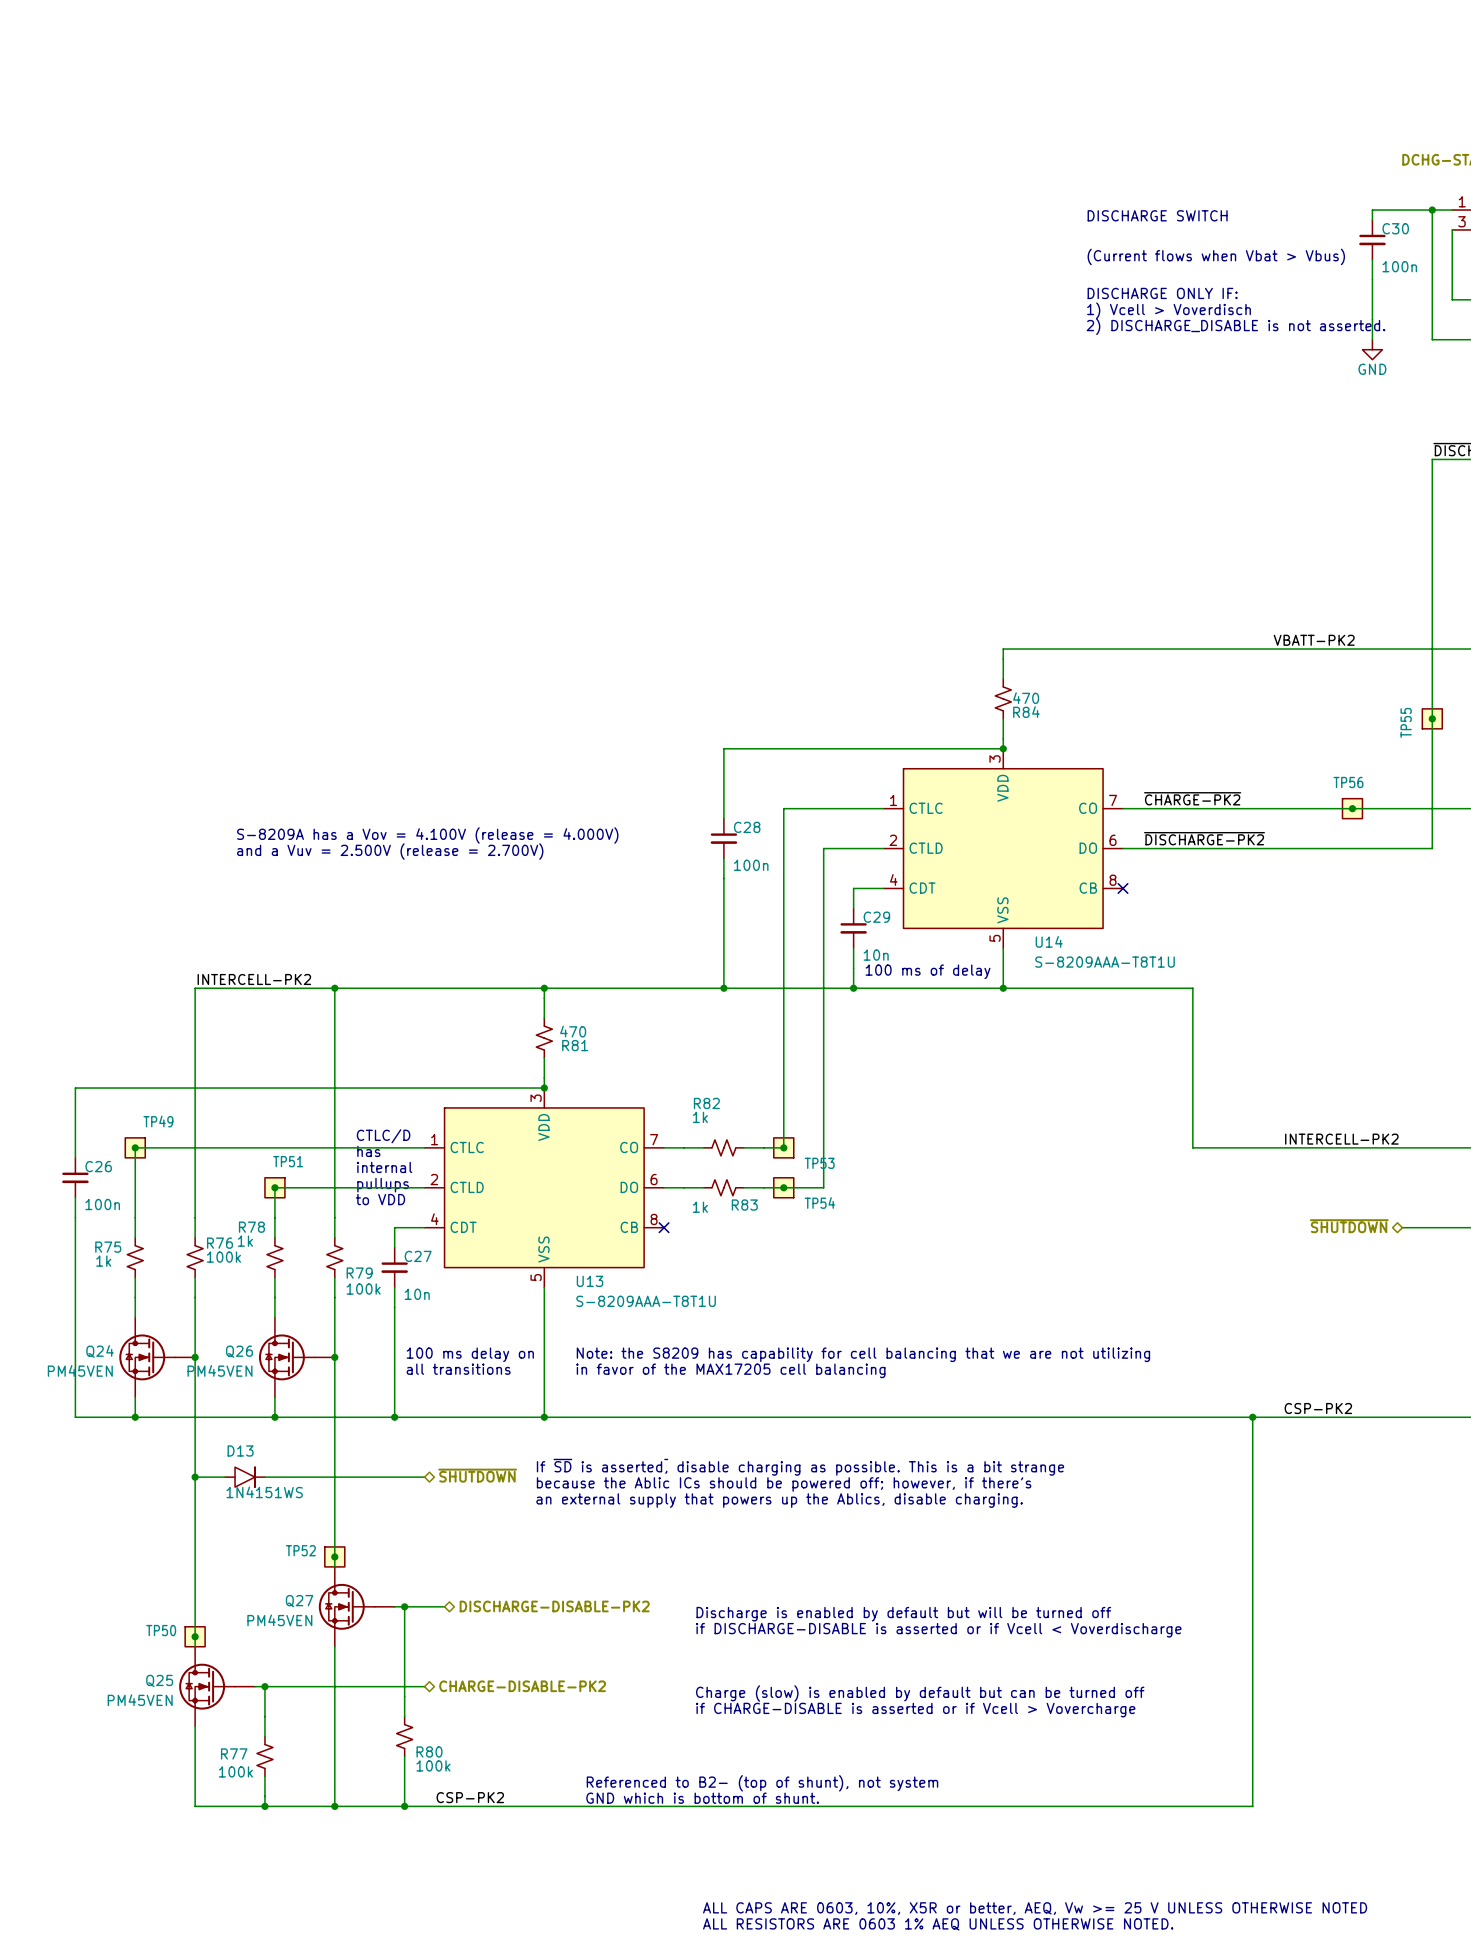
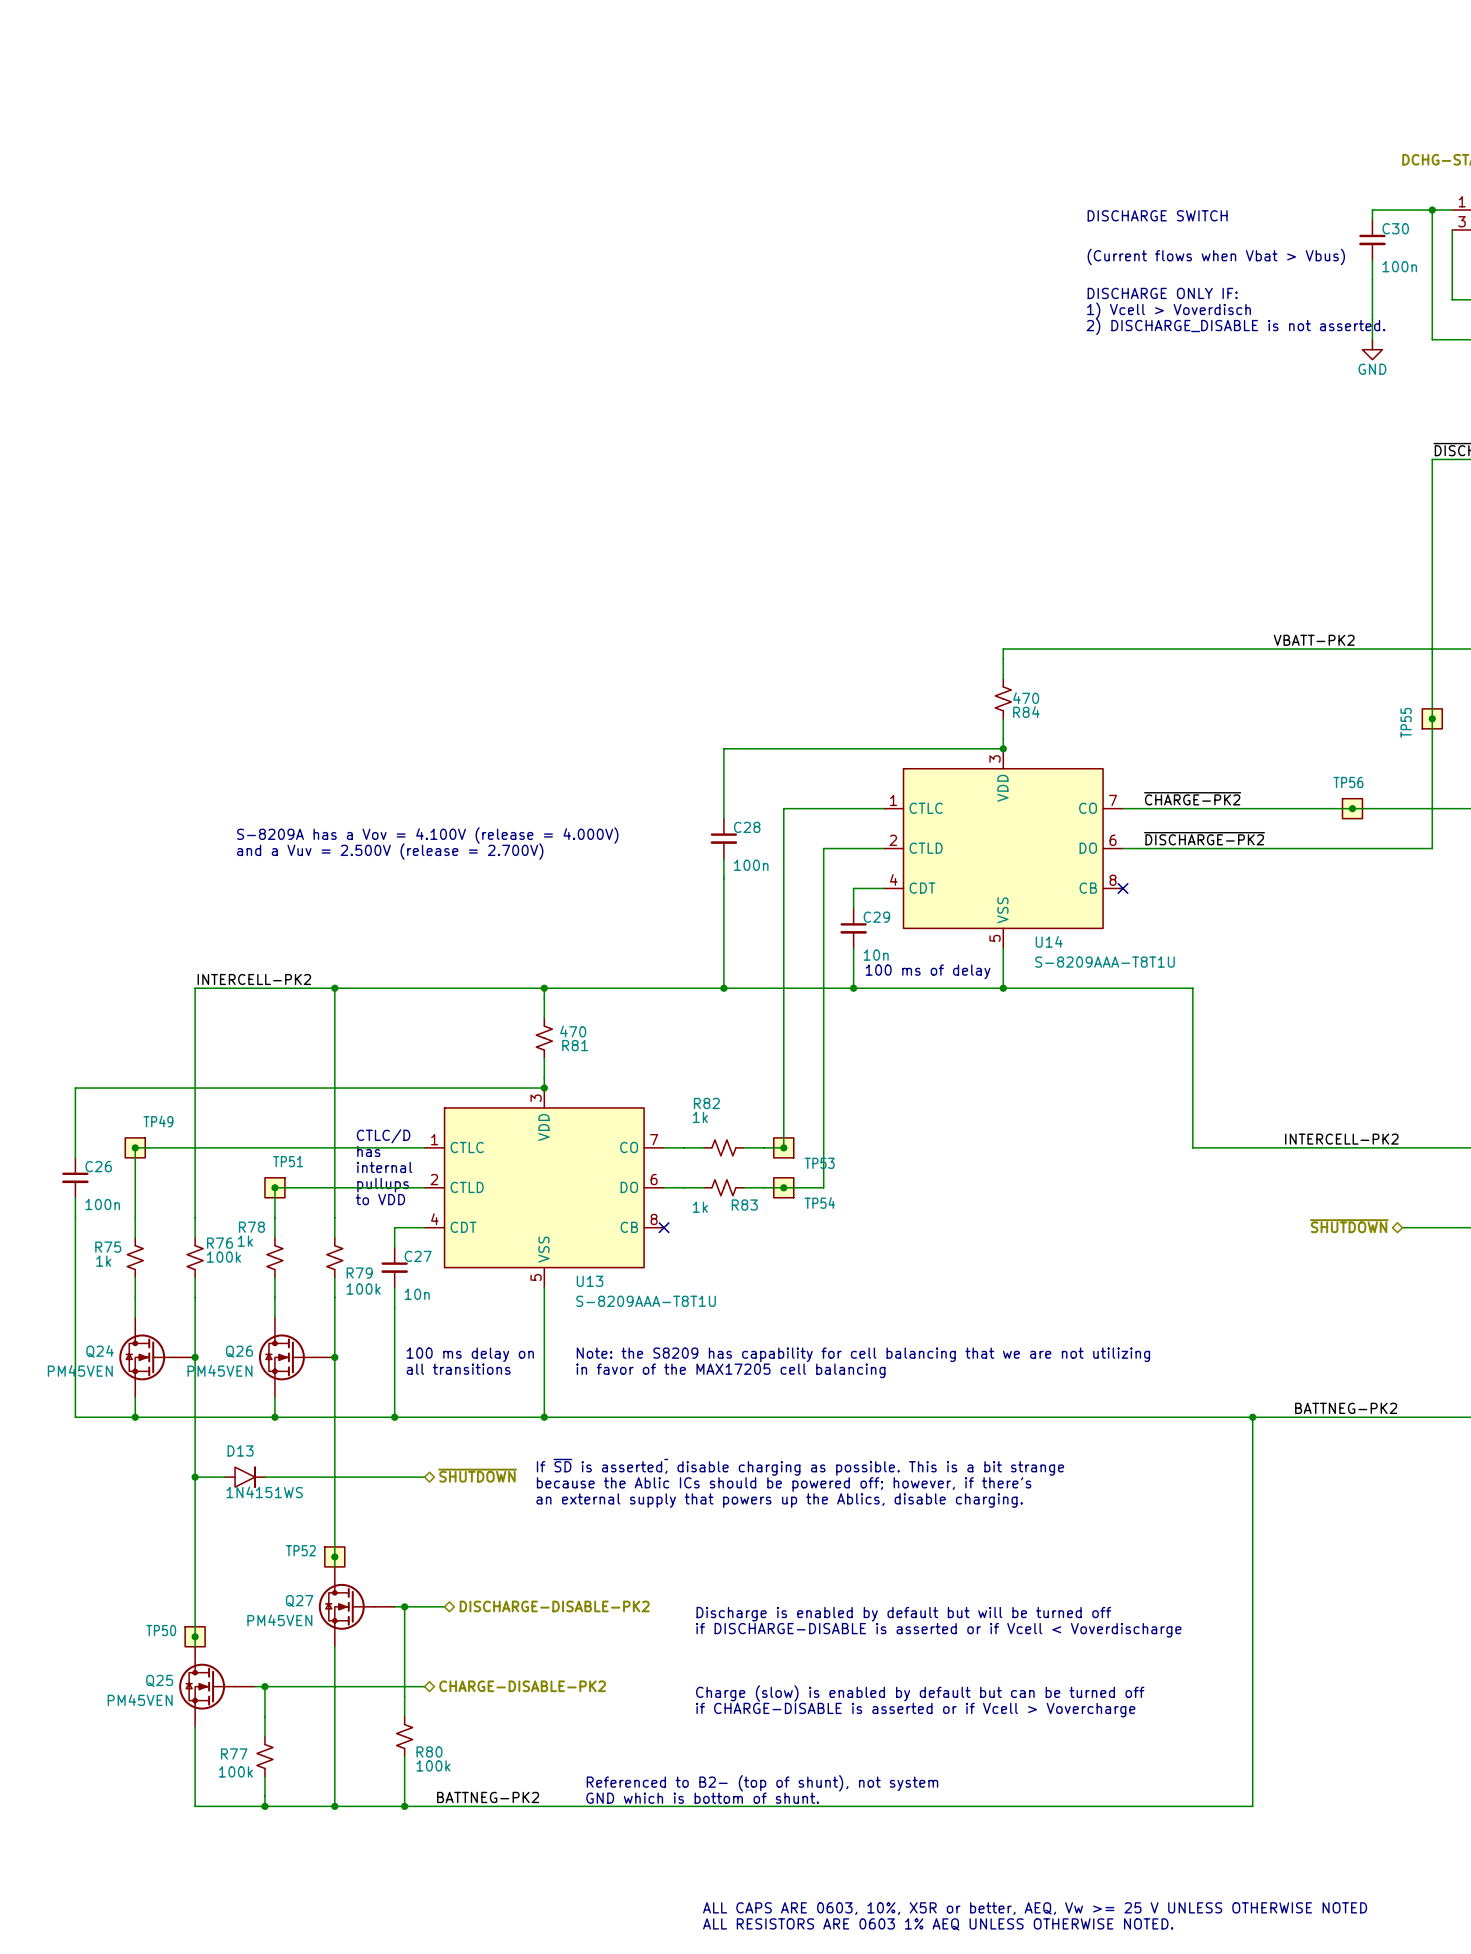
label: CSP-PK2 (1318, 1408) -> none
label: none -> BATTNEG-PK2 (1346, 1408)
label: CSP-PK2 (470, 1797) -> BATTNEG-PK2 (488, 1797)

